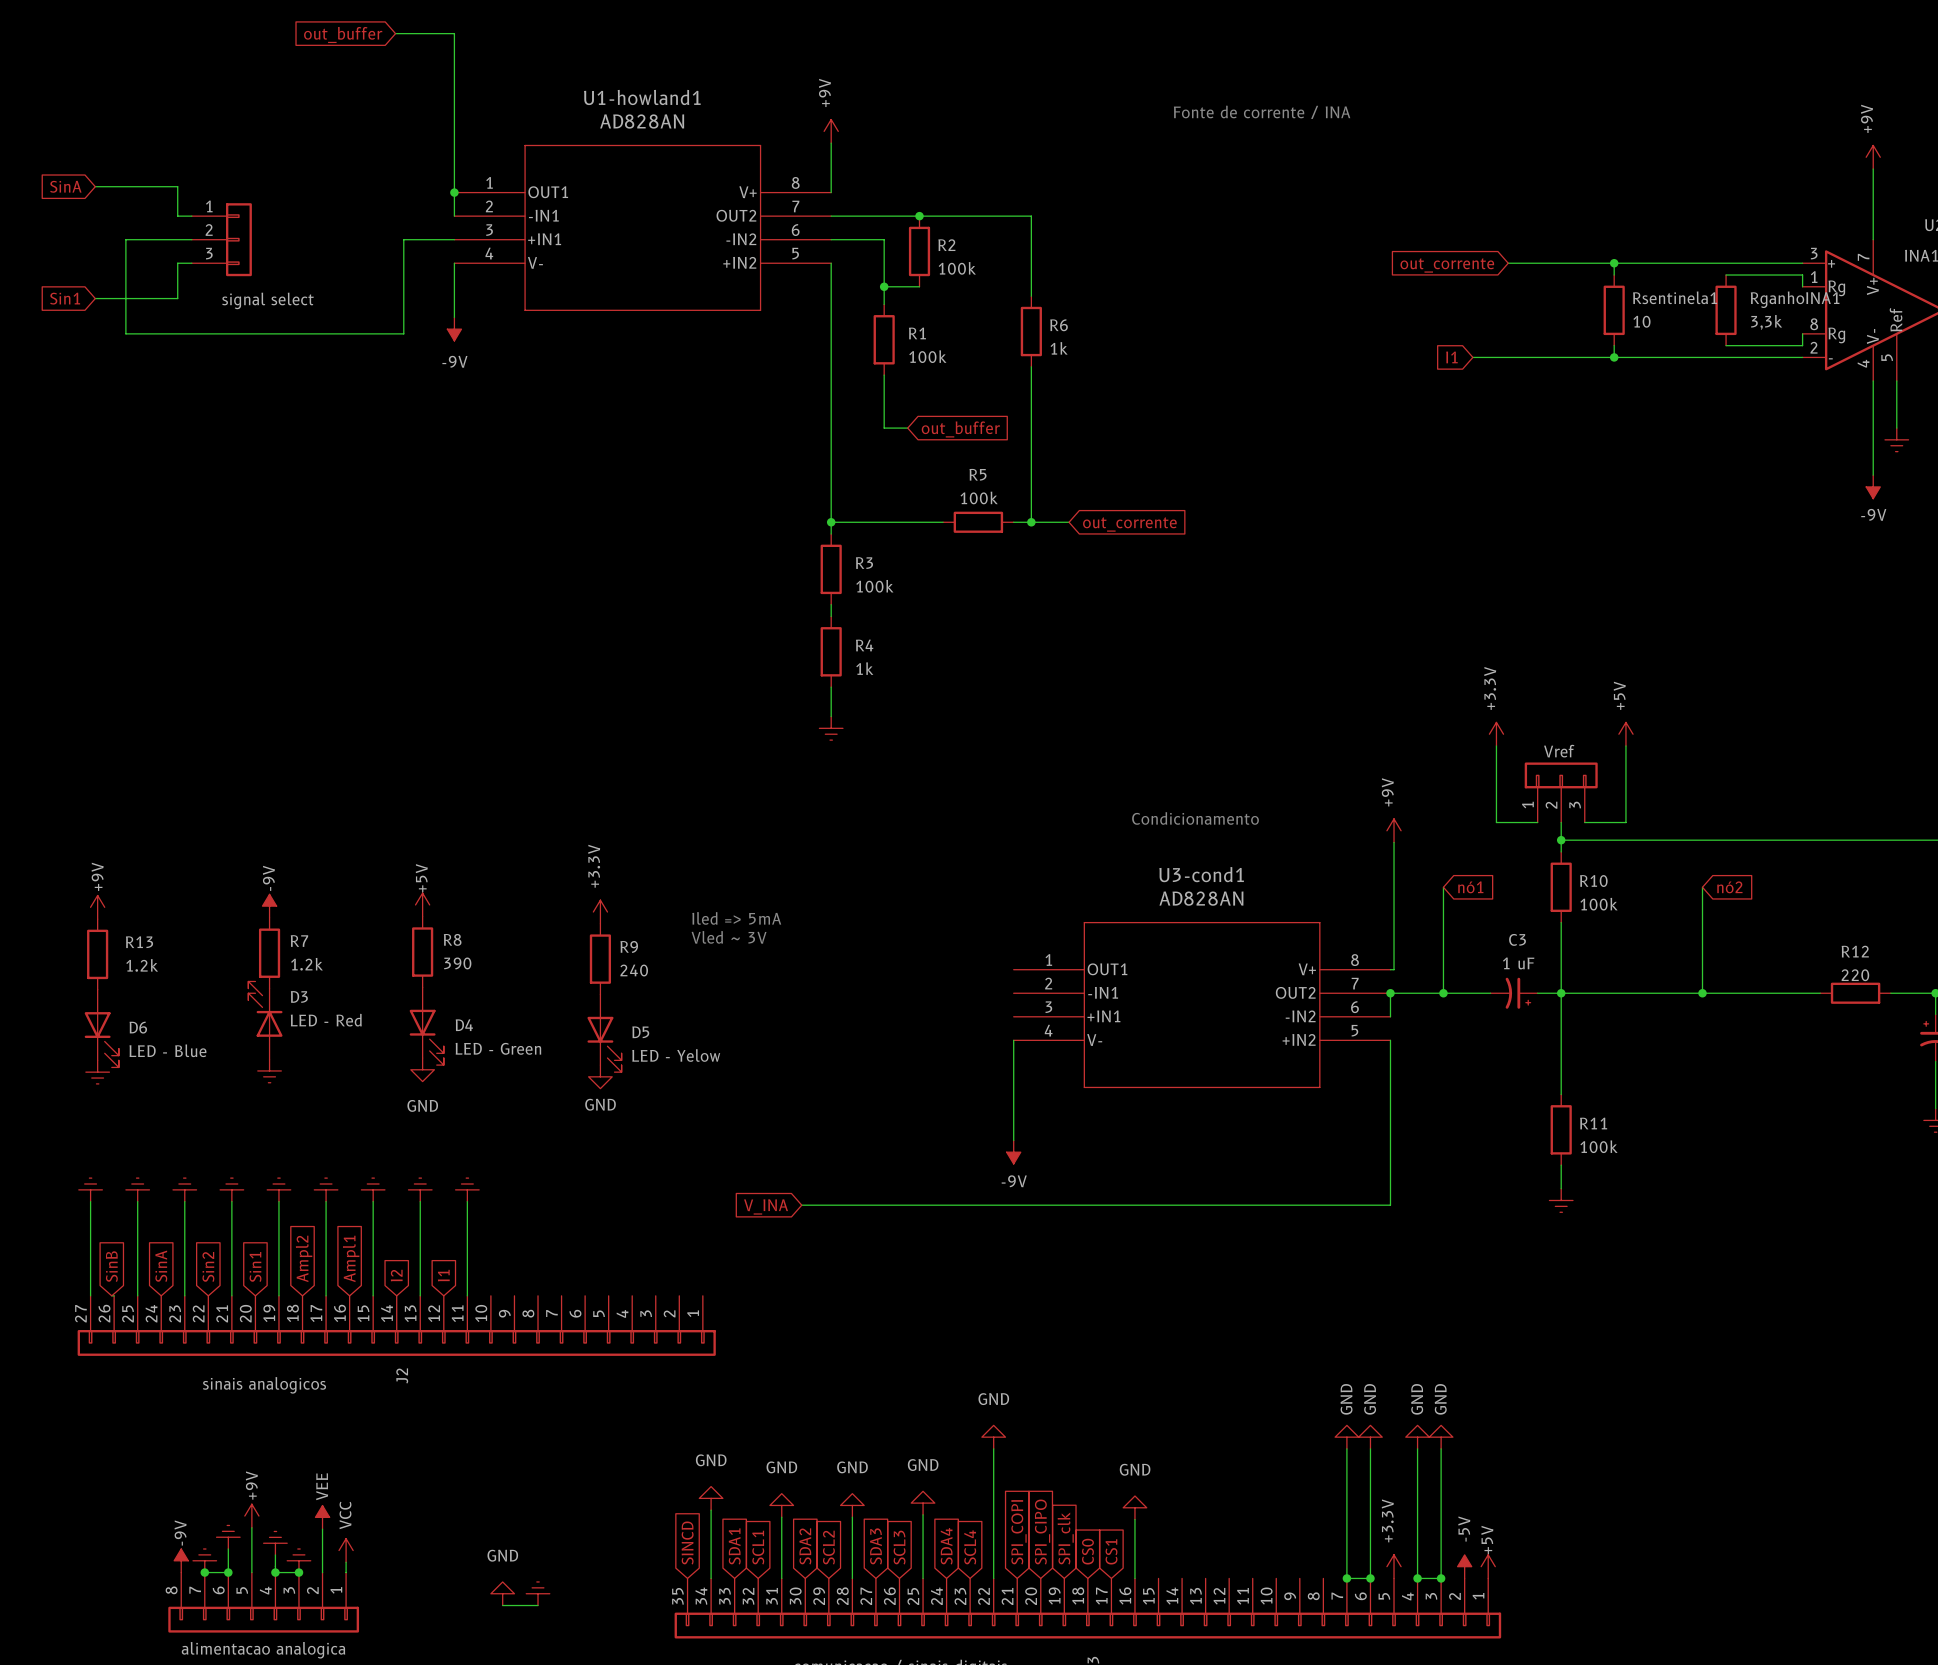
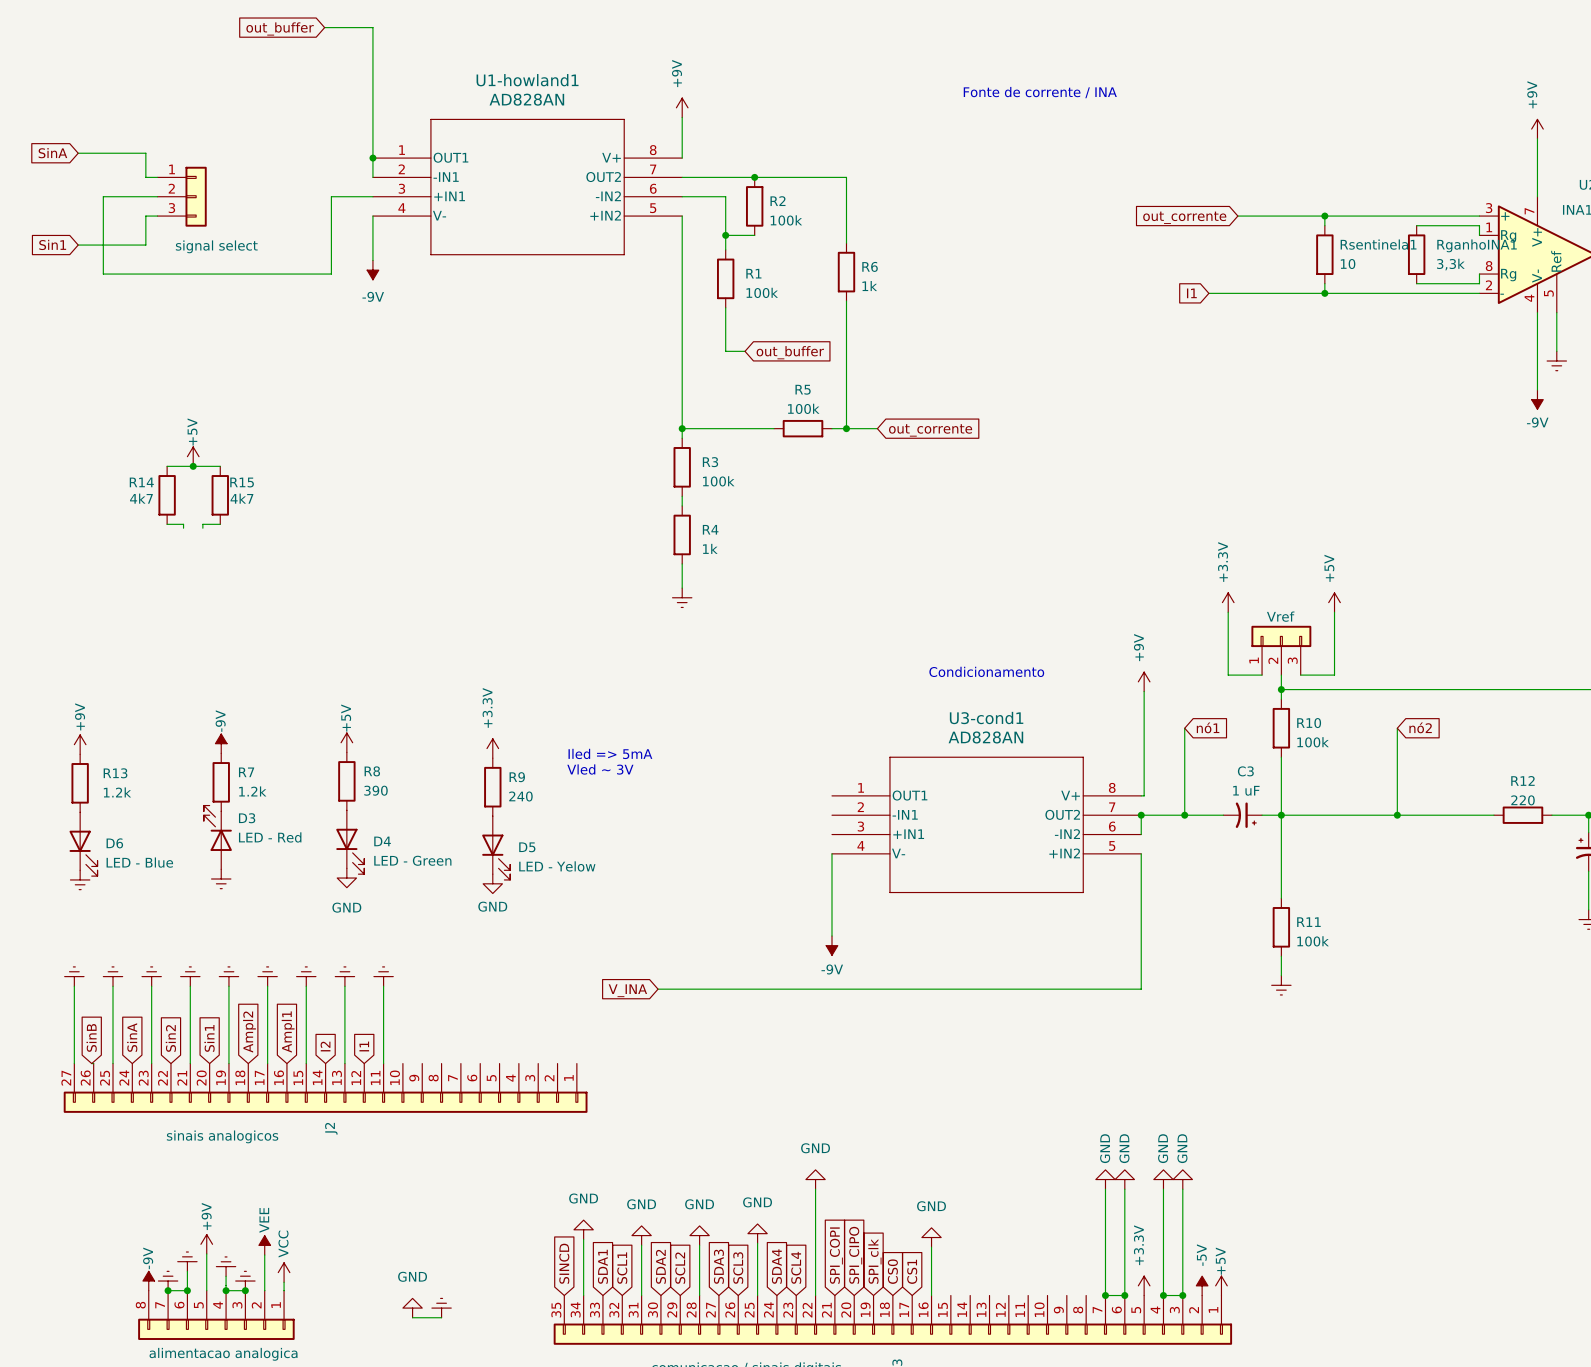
power symbol: none -> +5V (193, 456)
wire: none -> (167, 466) (220, 466)
junction: none -> (193, 466)
R14: none -> 4k7 (167, 495)
R15: none -> 4k7 (220, 495)
wire: none -> (167, 524) (183, 524) (183, 528)
wire: none -> (220, 524) (202, 524) (202, 528)

